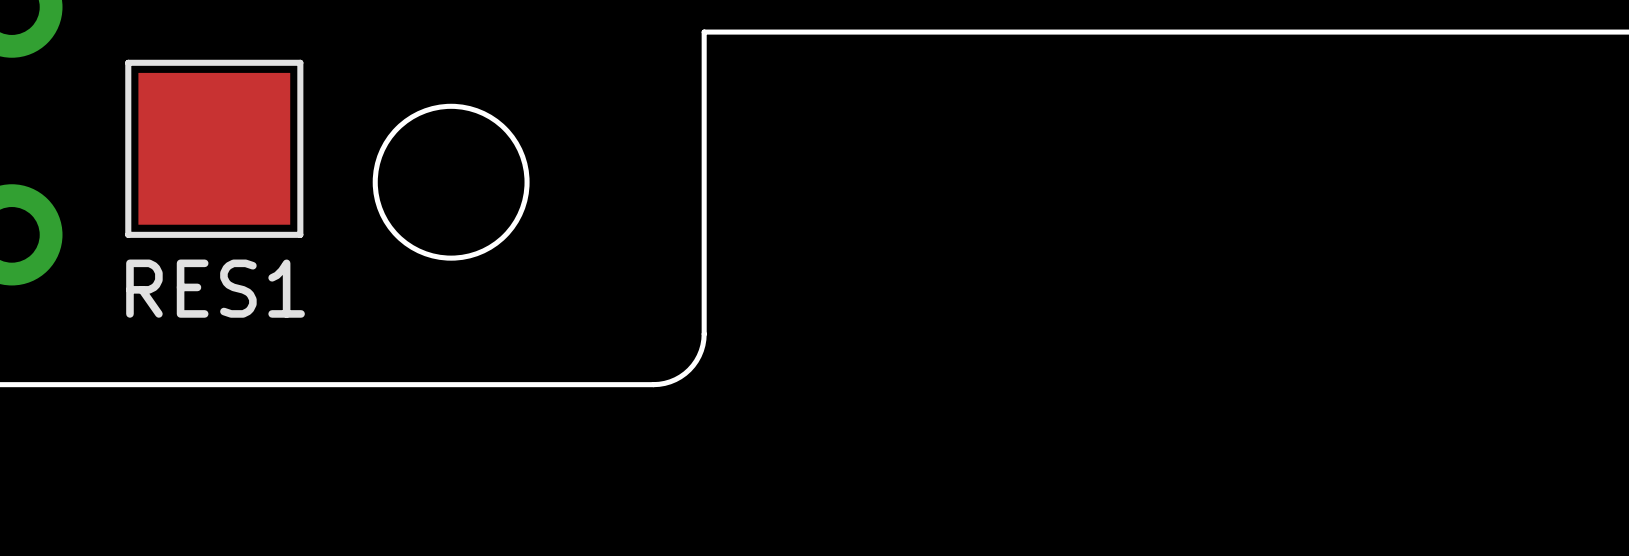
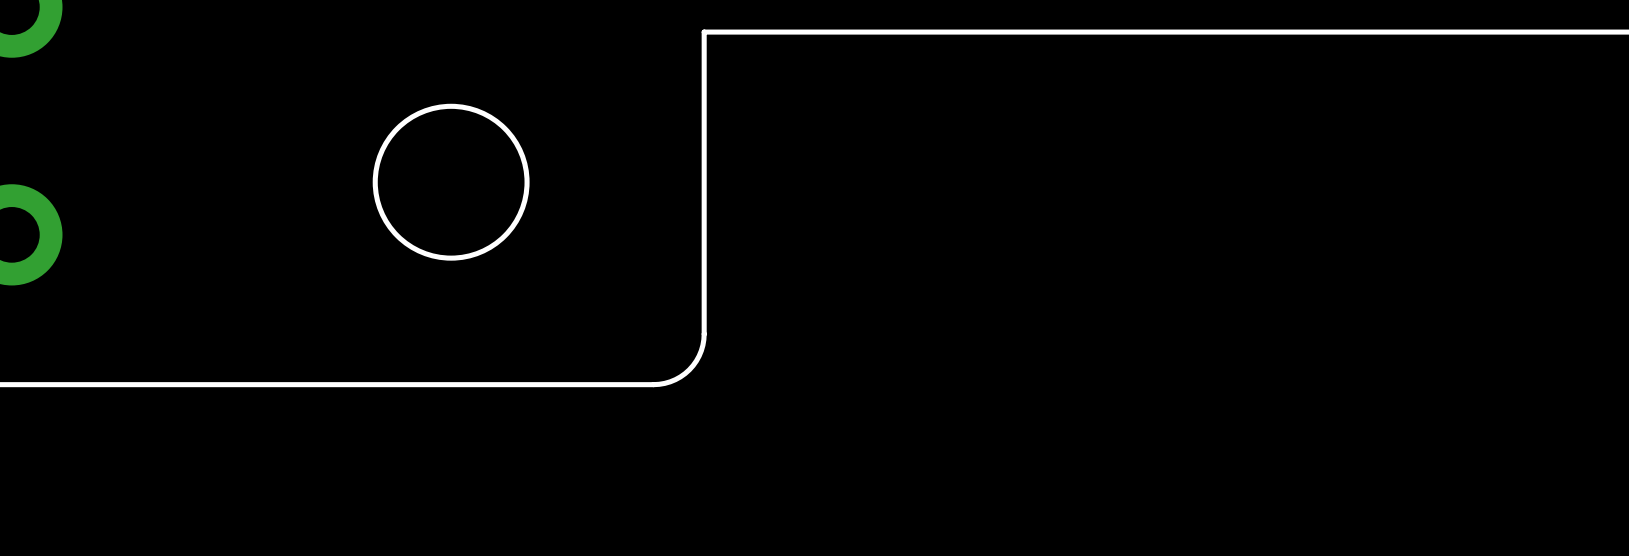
RES1: (214, 148) -> none

